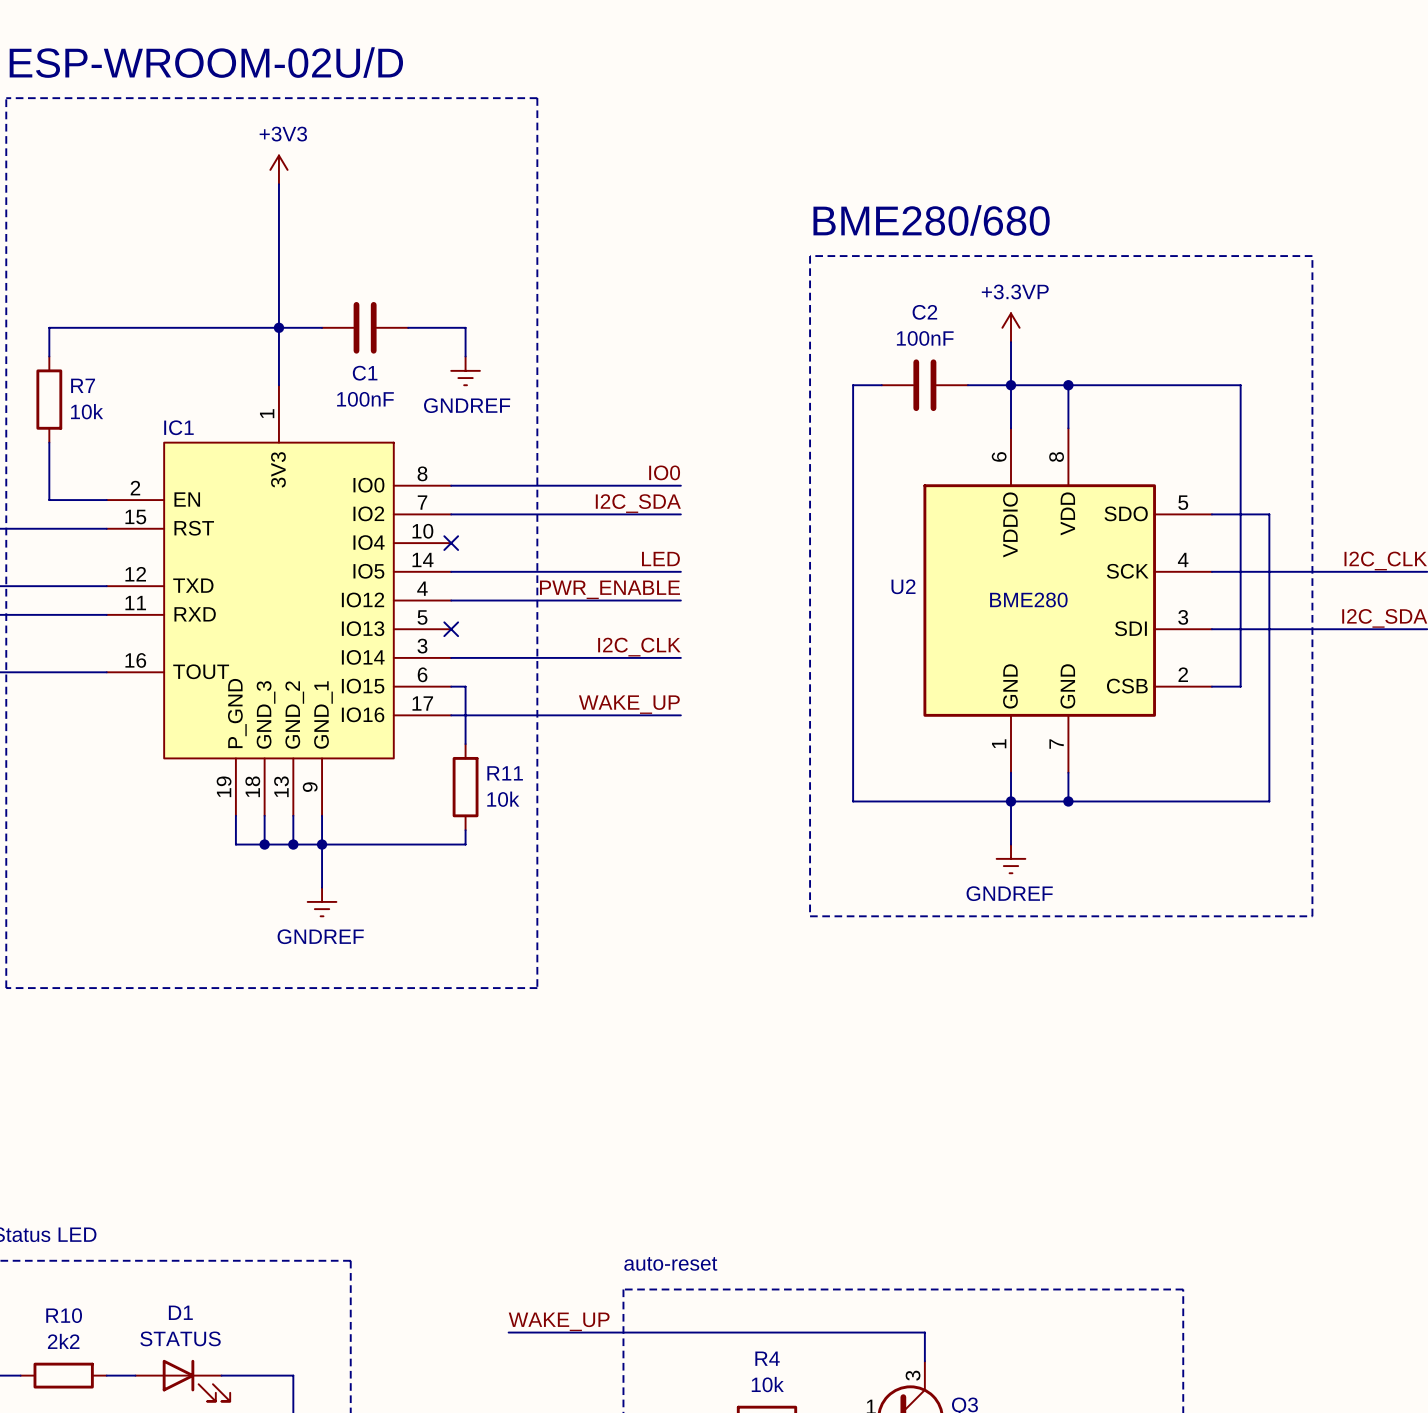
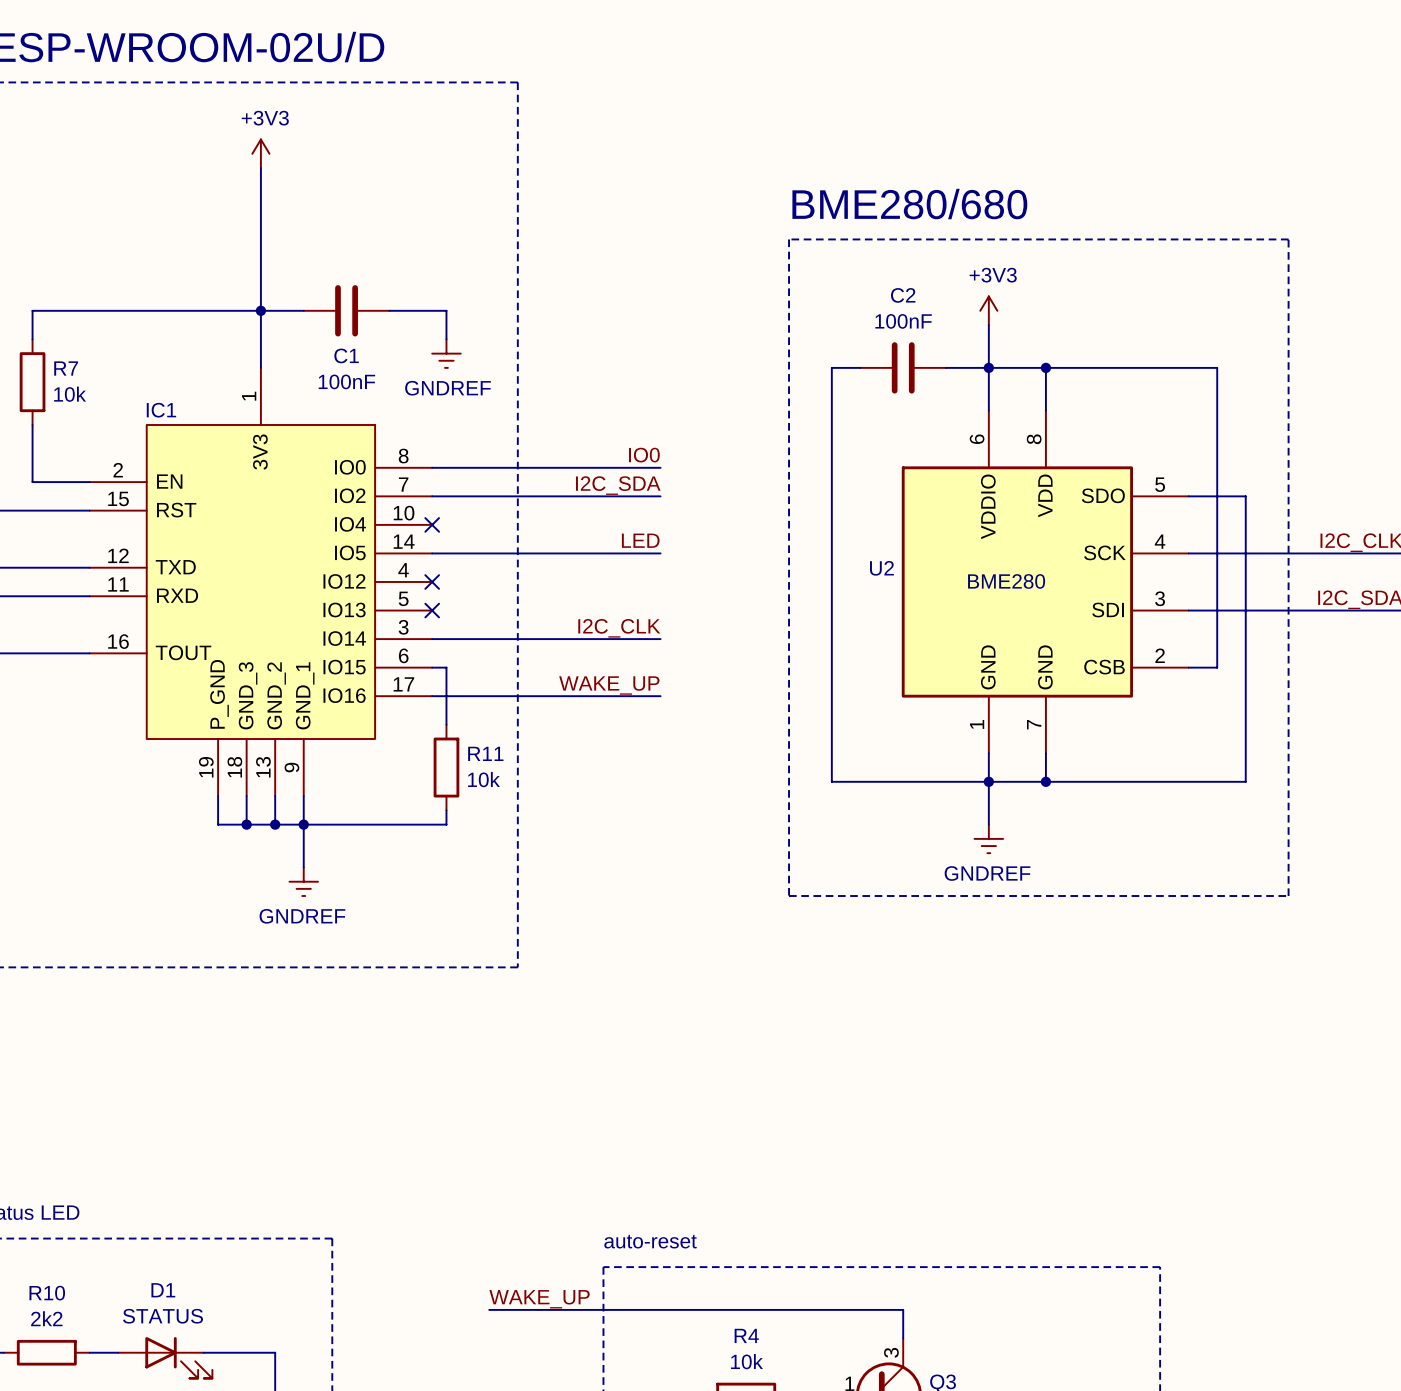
power symbol: +3.3VP (1011, 327) -> +3V3 (988, 310)
label: PWR_ENABLE (609, 589) -> none
wire: (451, 600) (680, 600) -> none
no-connect mark: none -> (432, 582)

